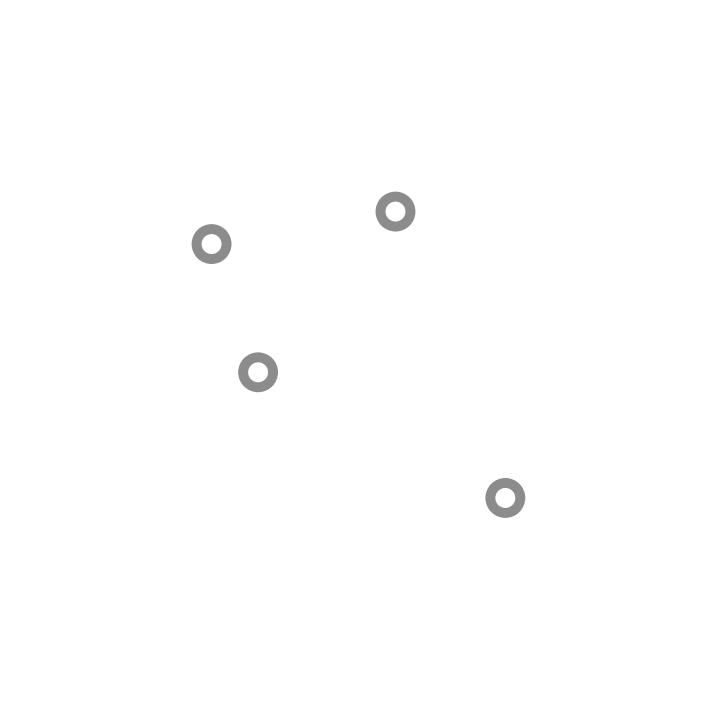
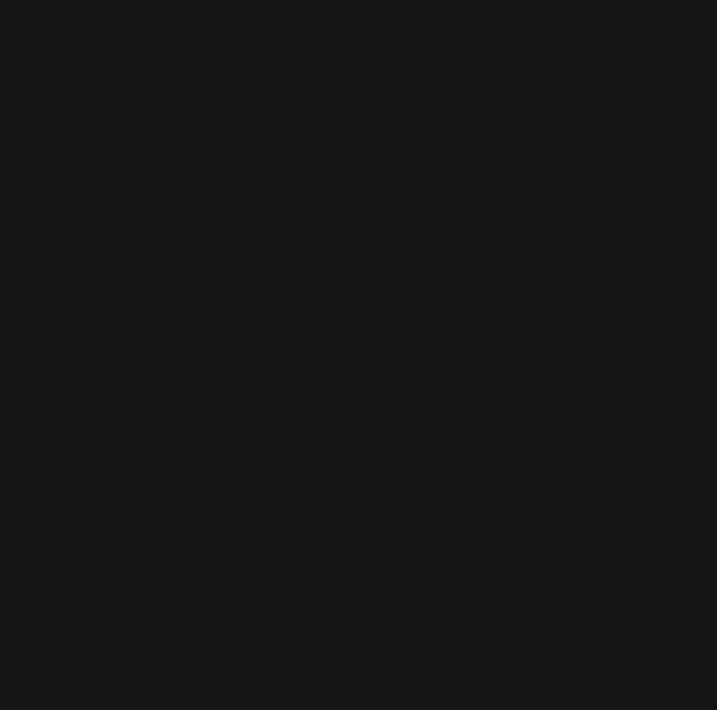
via: (395, 211) -> none
via: (211, 244) -> none
via: (258, 372) -> none
via: (505, 497) -> none

